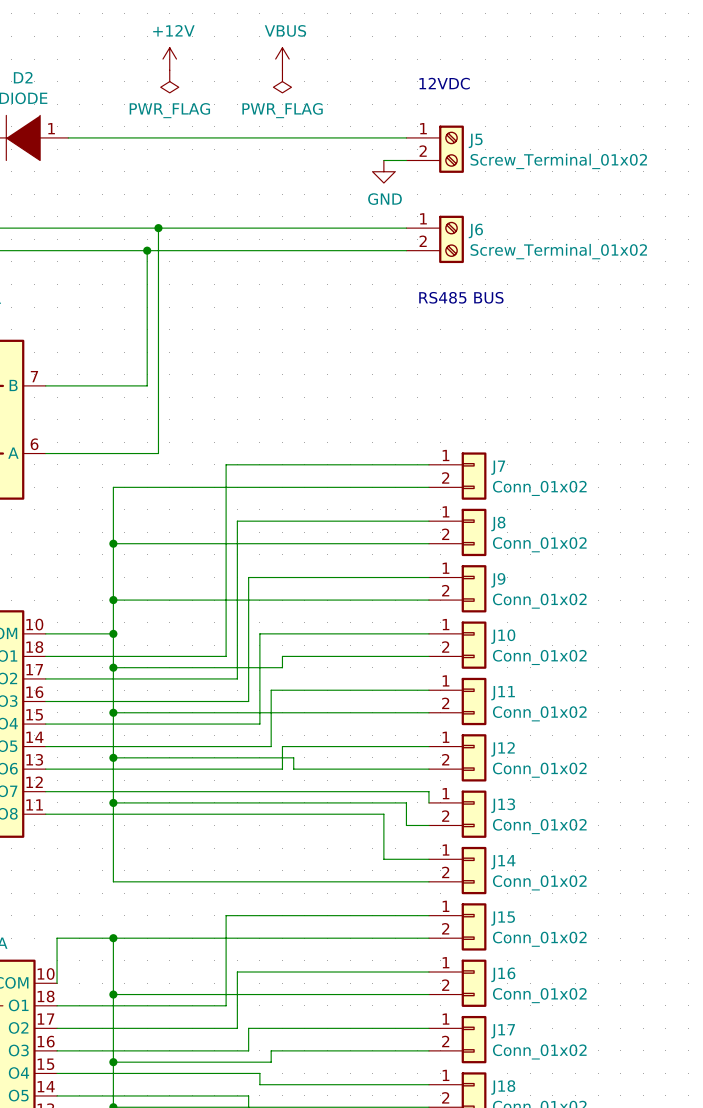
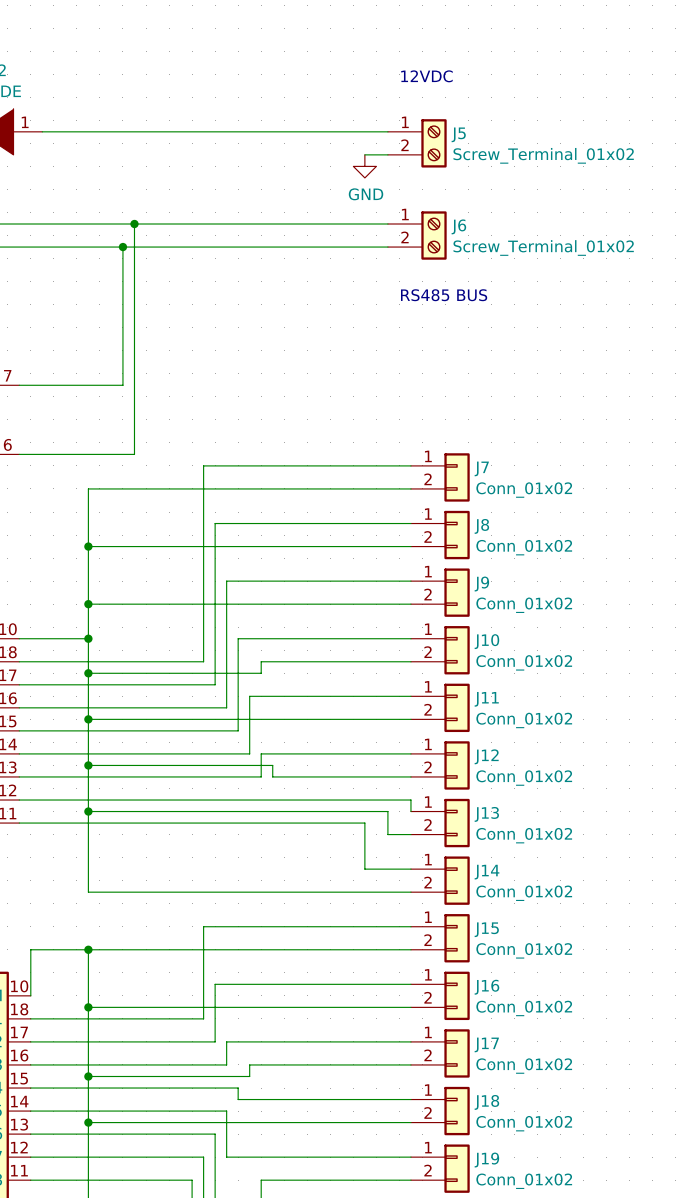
power symbol: +12V (169, 59) -> none
power symbol: VBUS (282, 59) -> none
power symbol: PWR_FLAG (169, 81) -> none
power symbol: PWR_FLAG (282, 81) -> none

